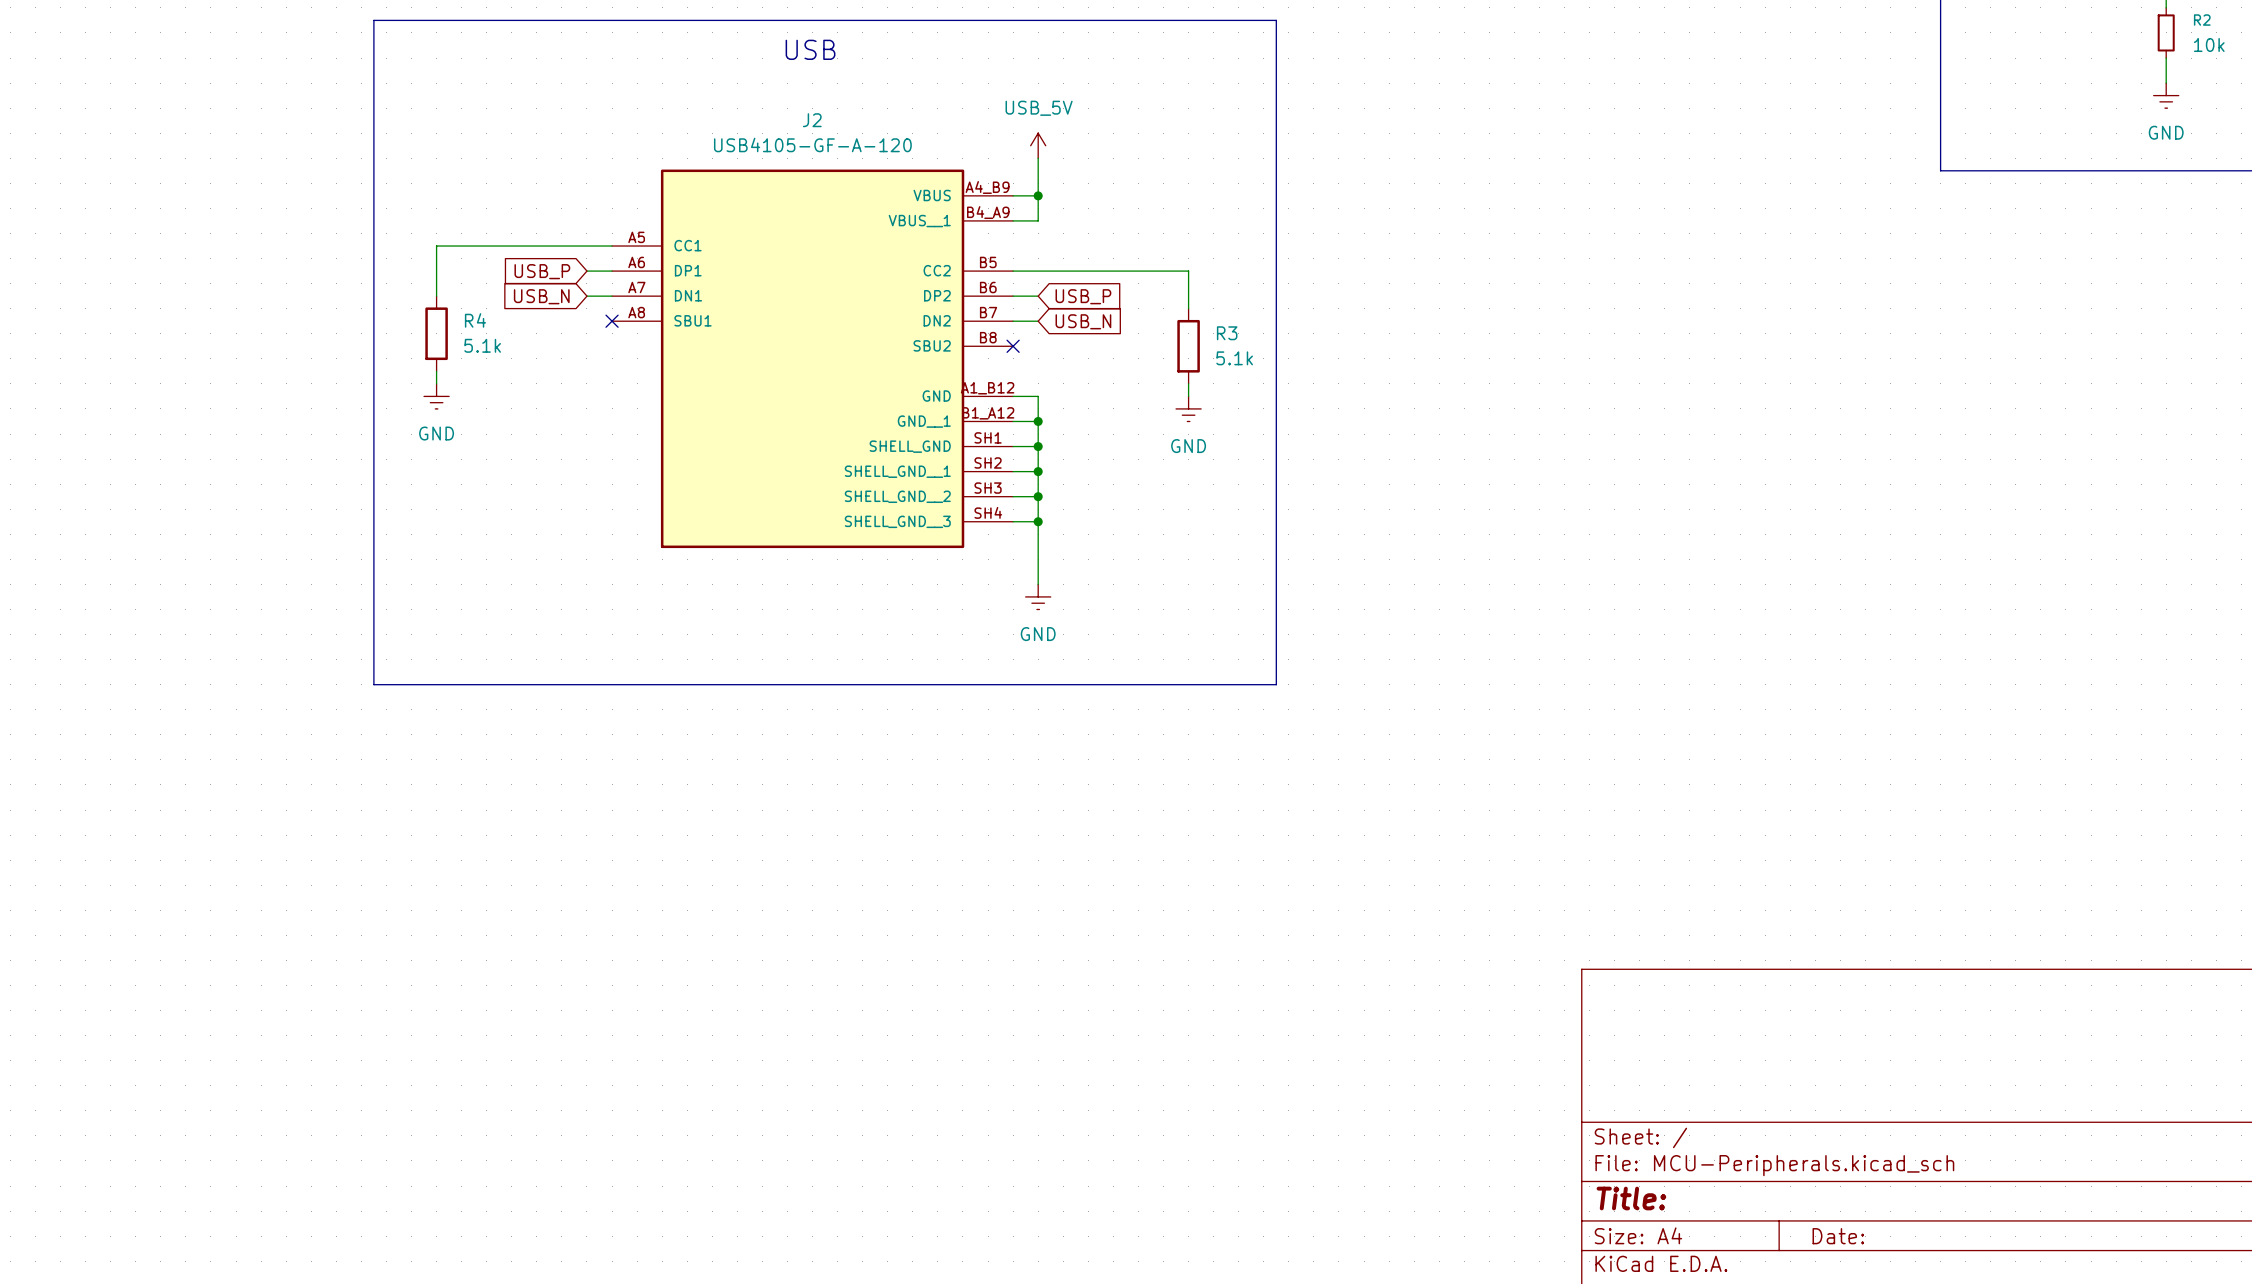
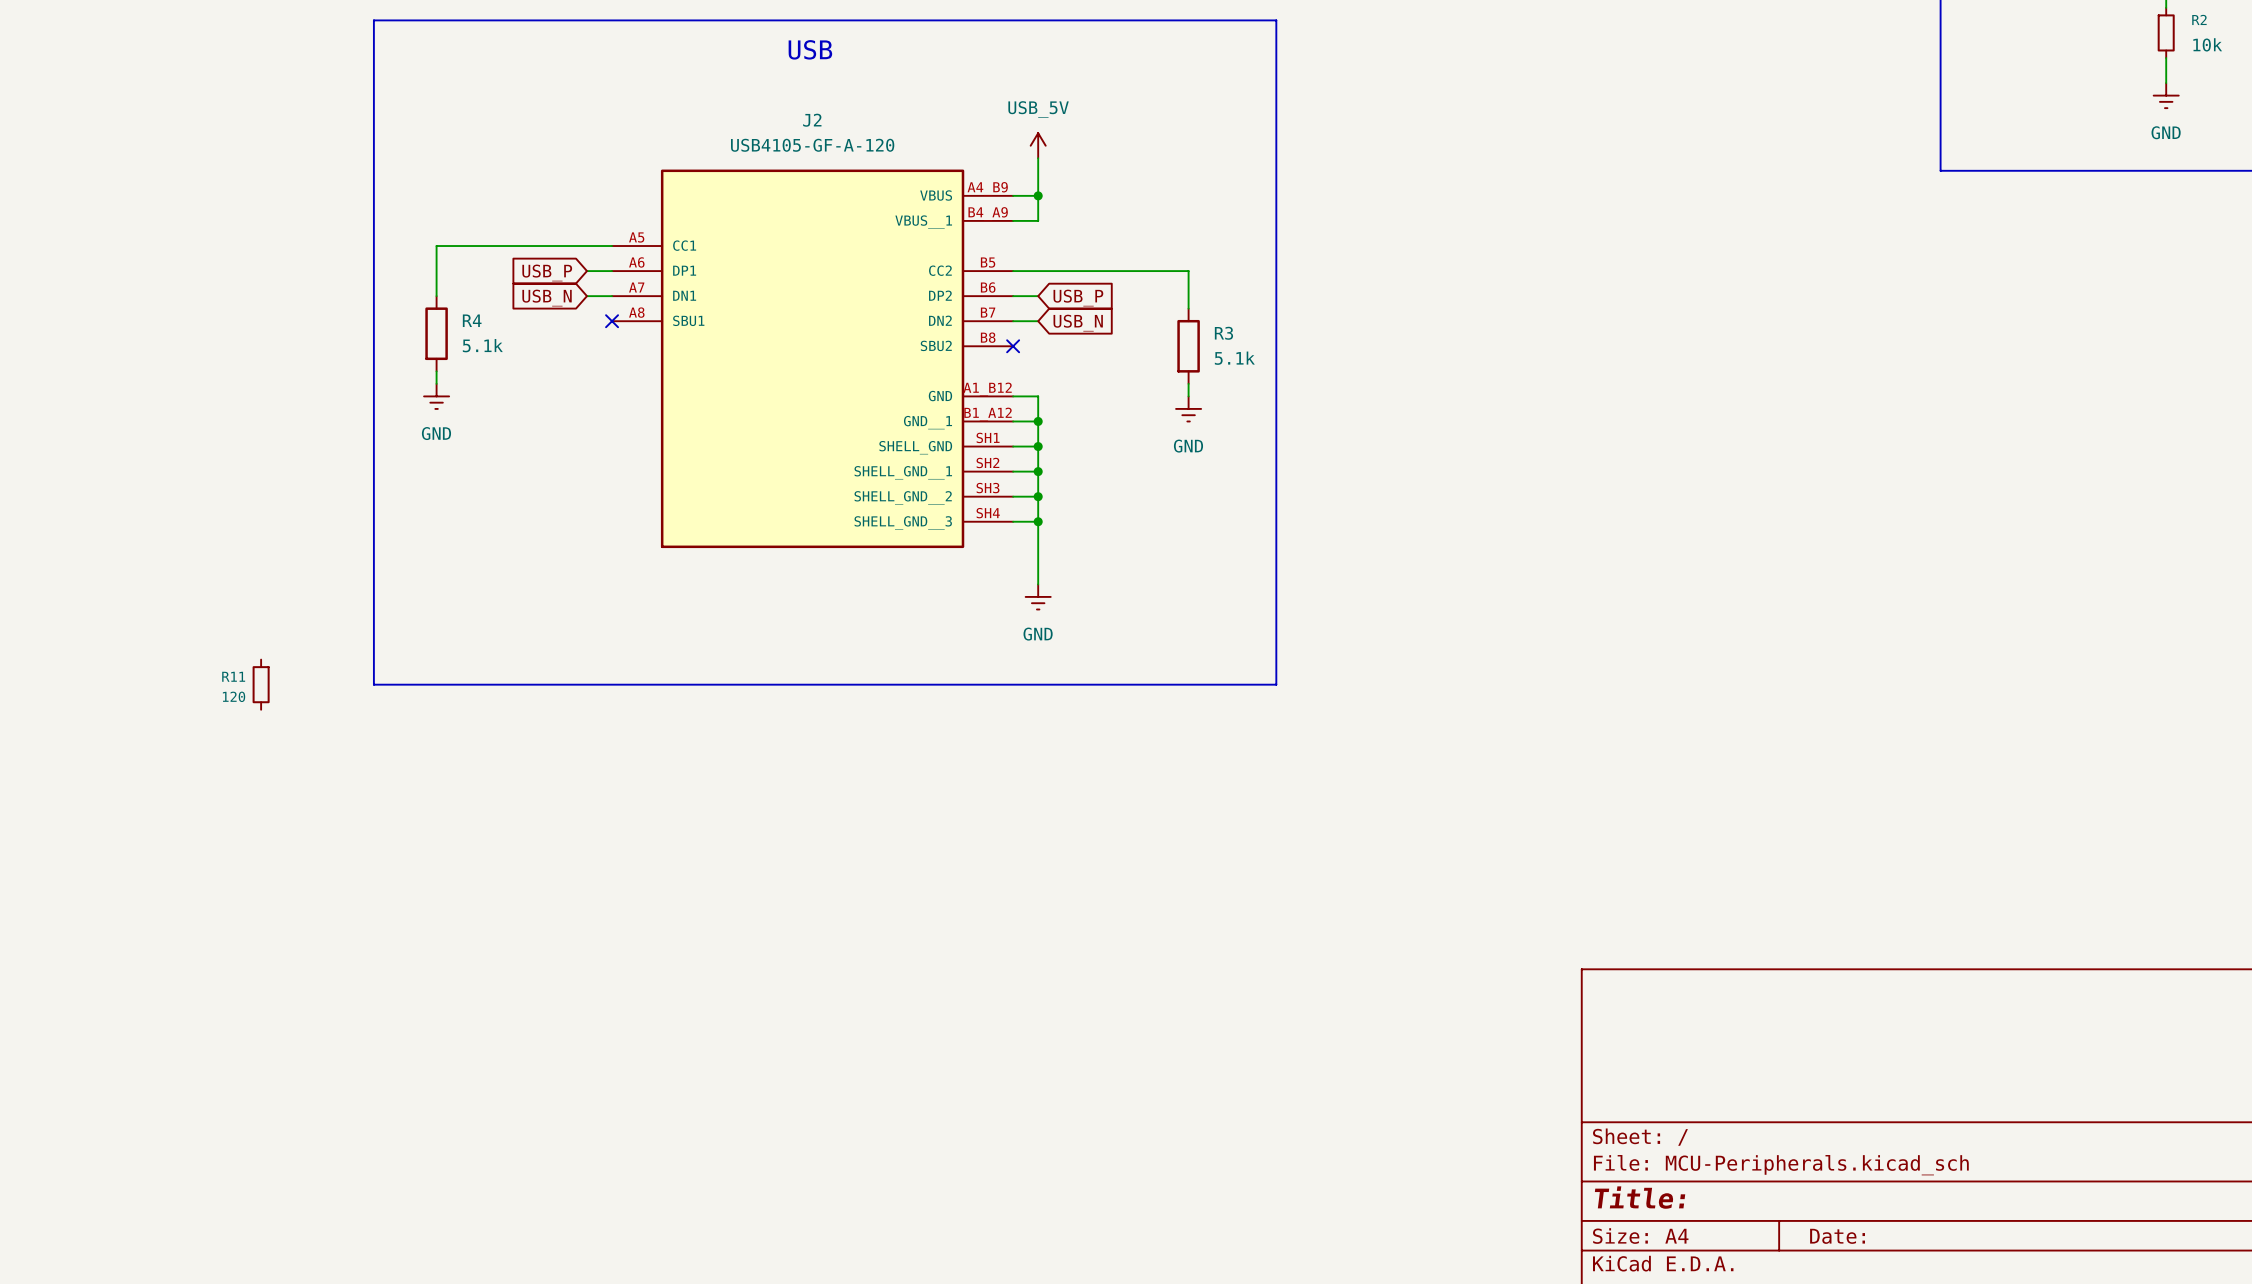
R11: none -> 120 (261, 684)

